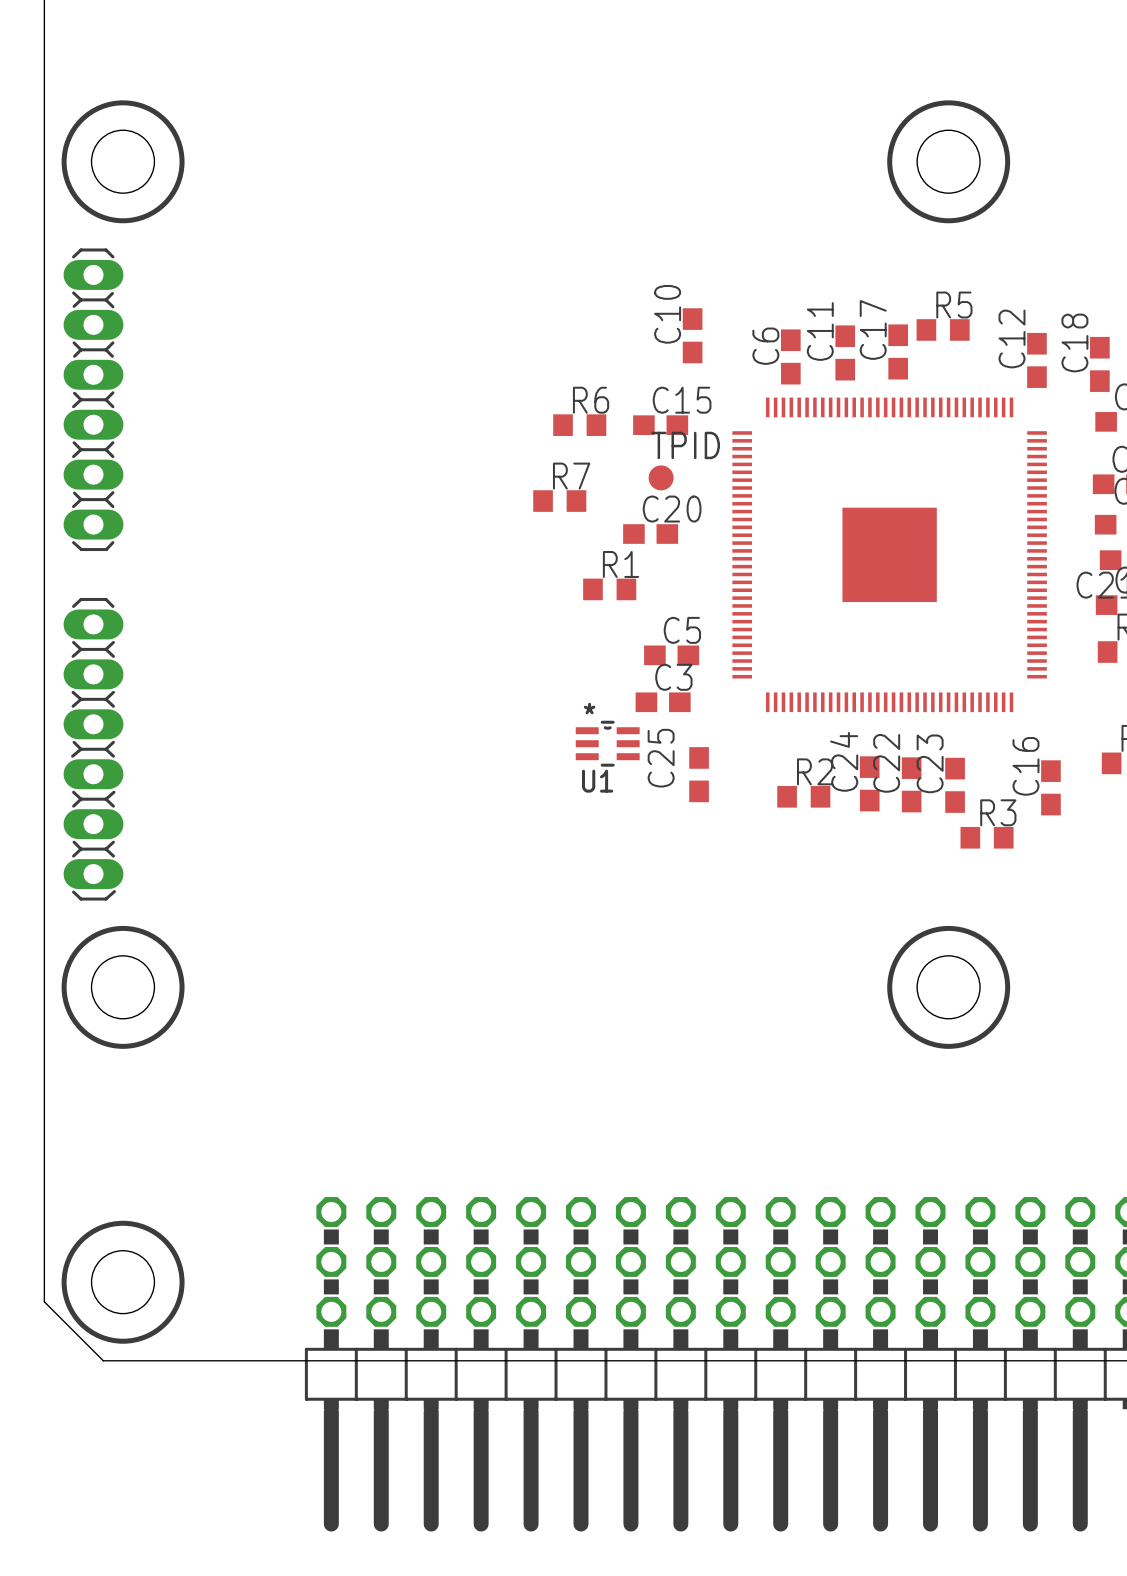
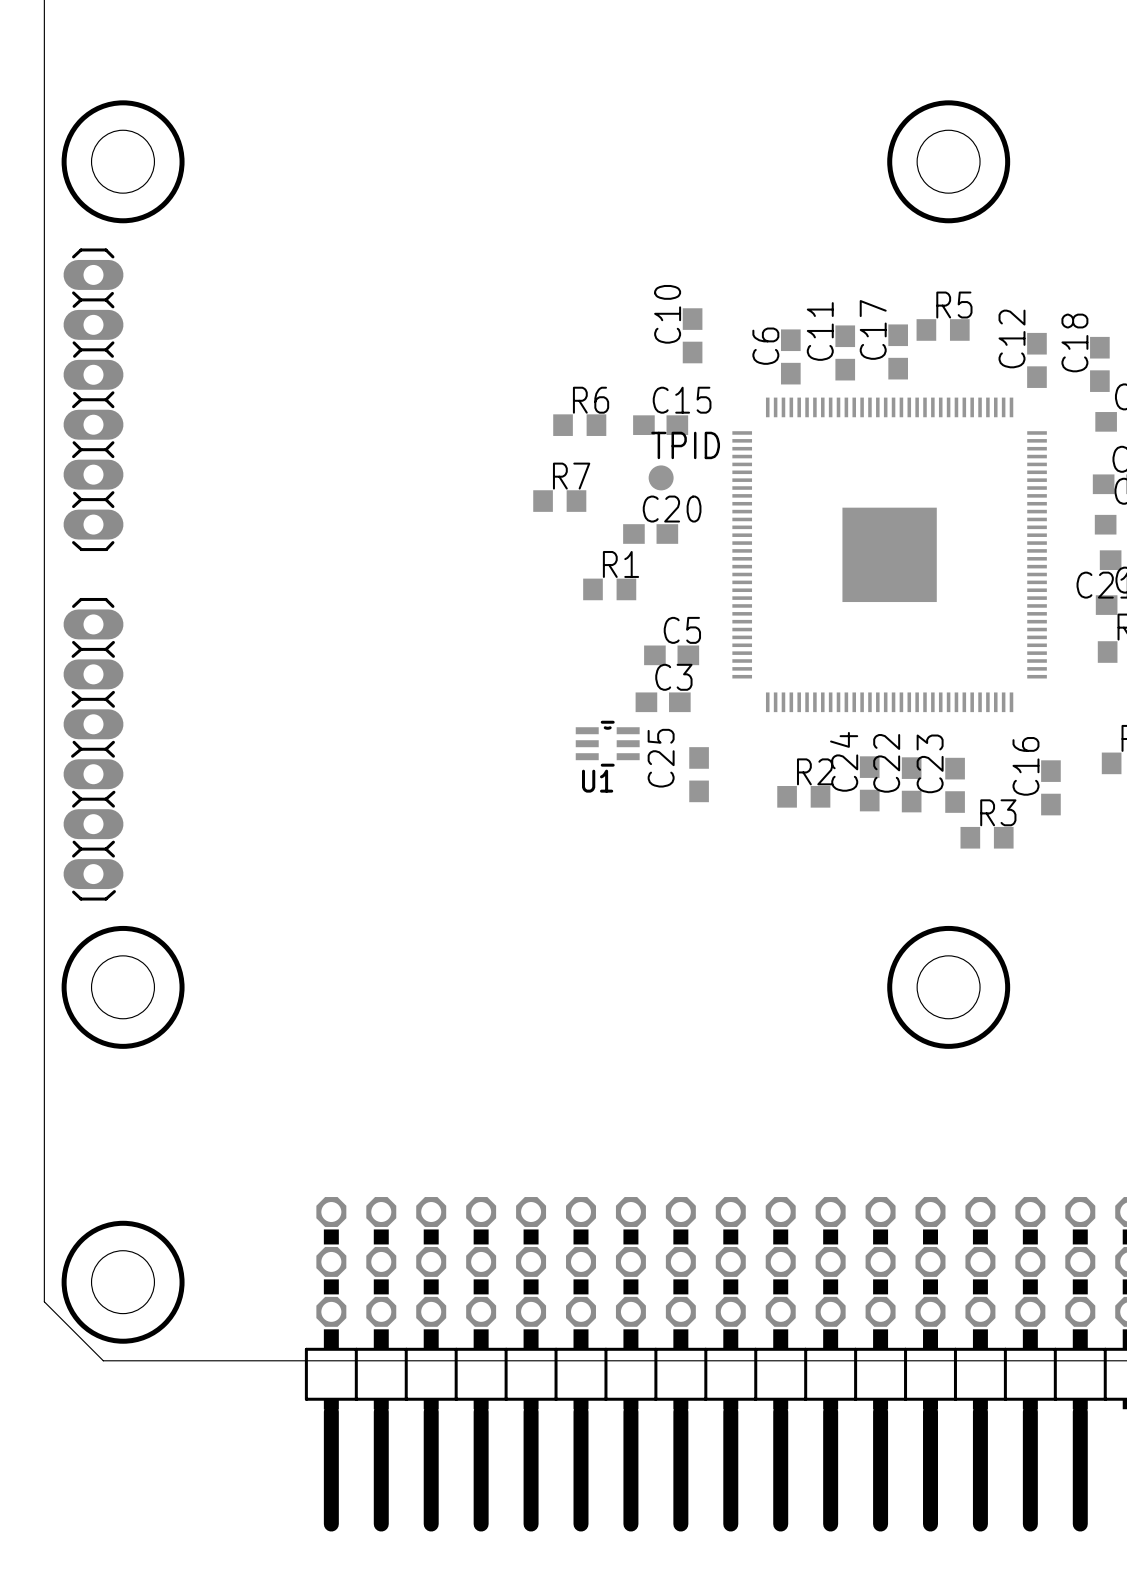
U1 text: * (589, 708) -> none

